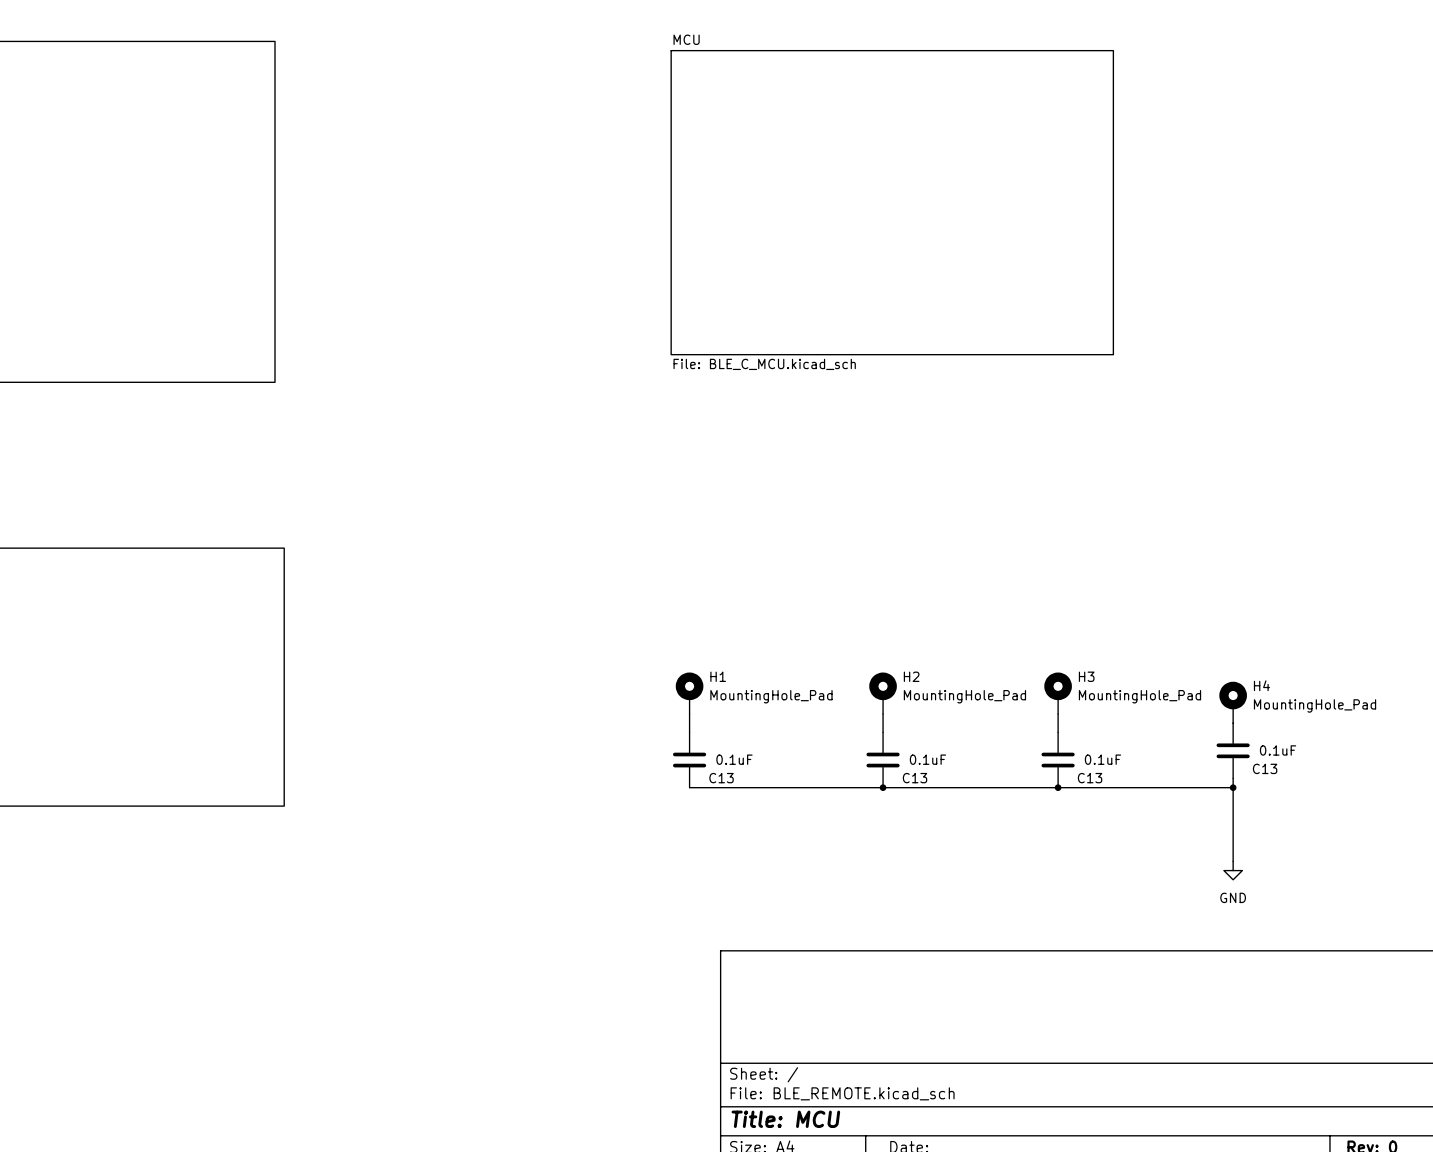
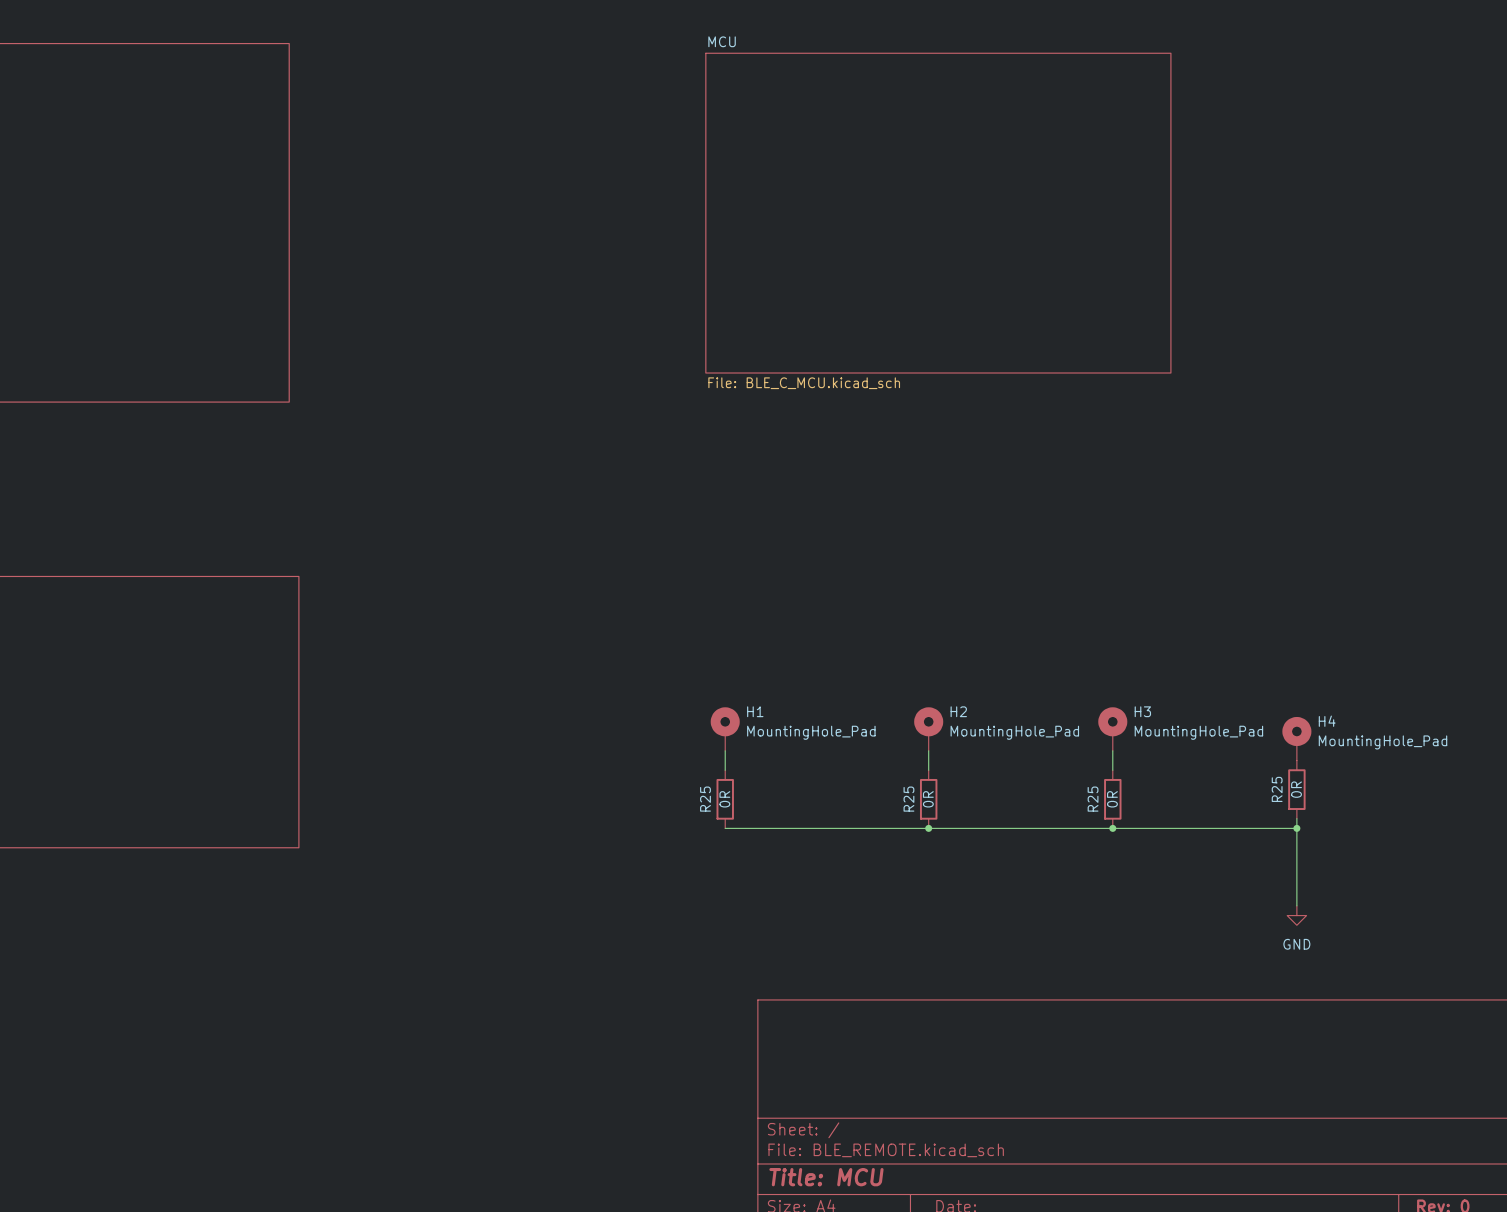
C13: 0.1uF (1233, 750) -> none
R25: none -> 0R (1296, 789)
C13: 0.1uF (689, 760) -> none
R25: none -> 0R (725, 799)
C13: 0.1uF (883, 760) -> none
R25: none -> 0R (928, 799)
C13: 0.1uF (1058, 760) -> none
R25: none -> 0R (1112, 799)

